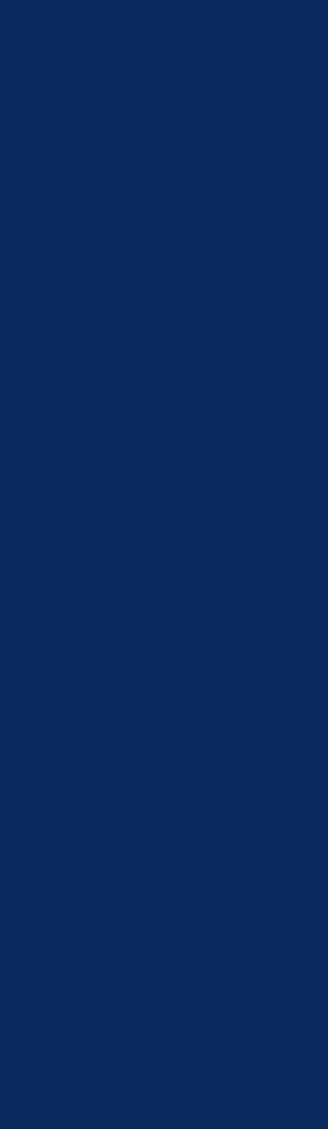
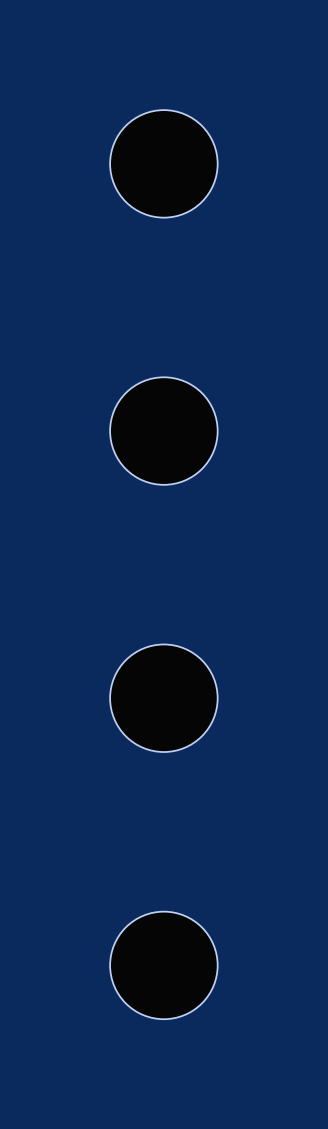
part: none -> (163, 163)
part: none -> (163, 431)
part: none -> (163, 698)
part: none -> (163, 965)

